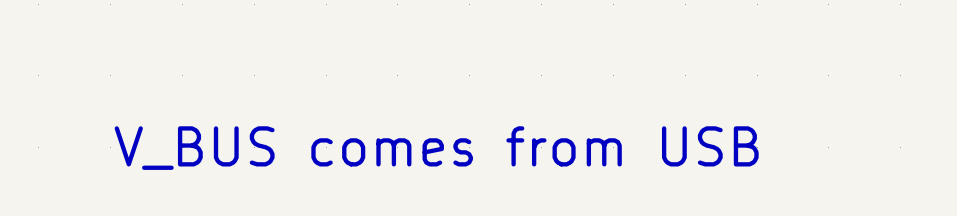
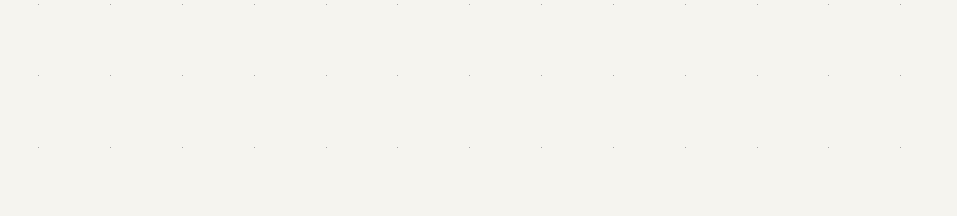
text: V_BUS comes from USB (436, 148) -> none

